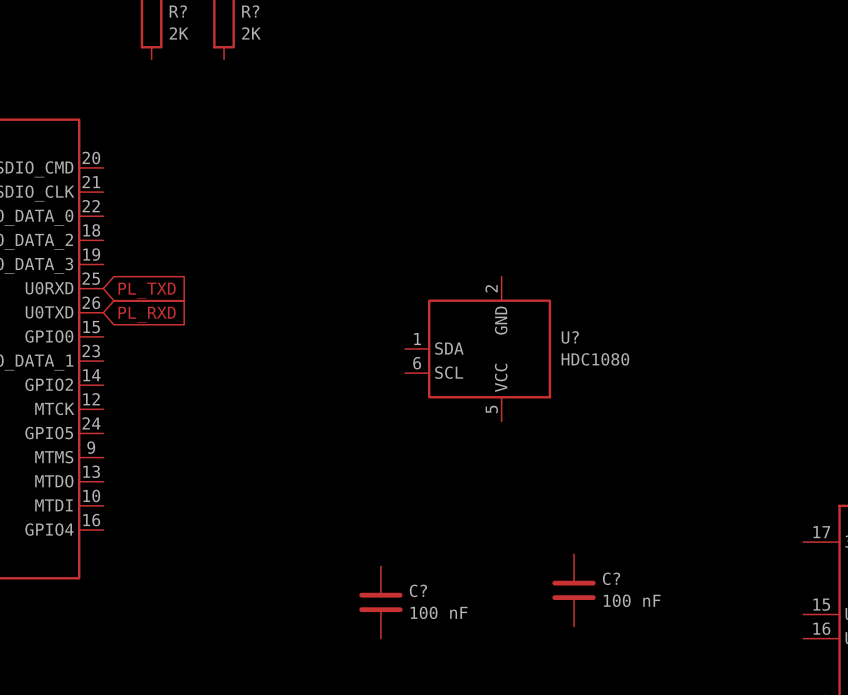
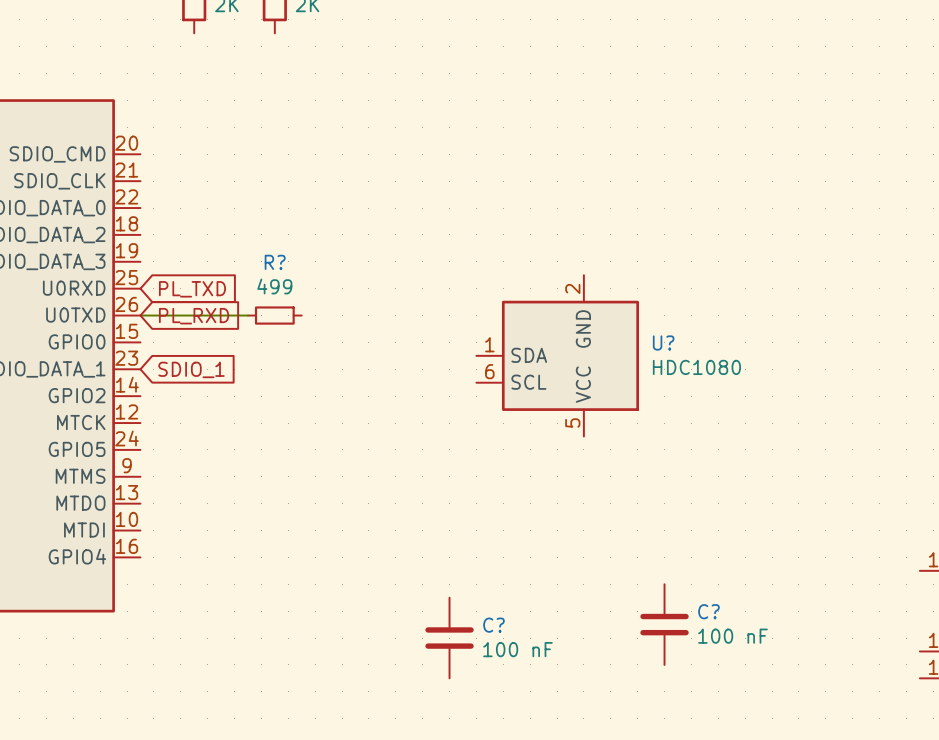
wire: none -> (140, 315) (247, 315)
R?: none -> 499 (274, 315)
global label: none -> SDIO_1 (191, 369)

